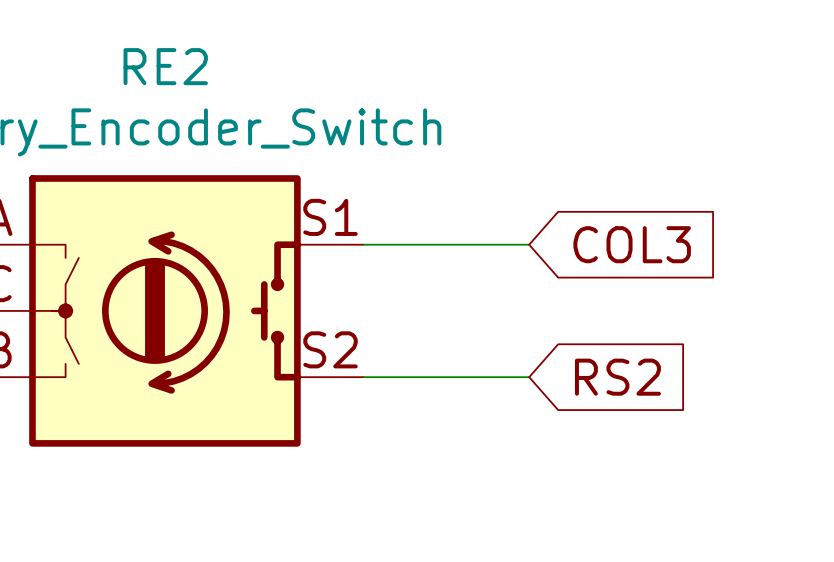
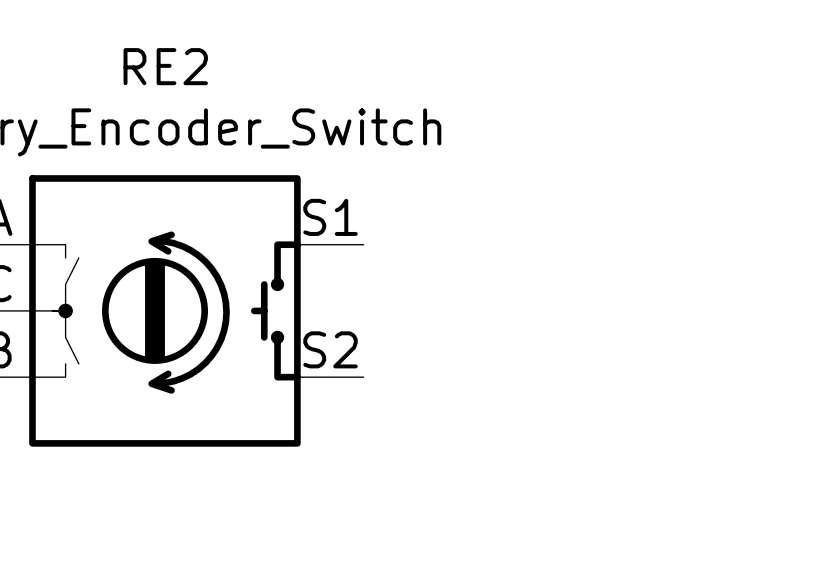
wire: (363, 244) (529, 244) -> none
global label: COL3 (632, 244) -> none
wire: (363, 377) (529, 377) -> none
global label: RS2 (617, 377) -> none

